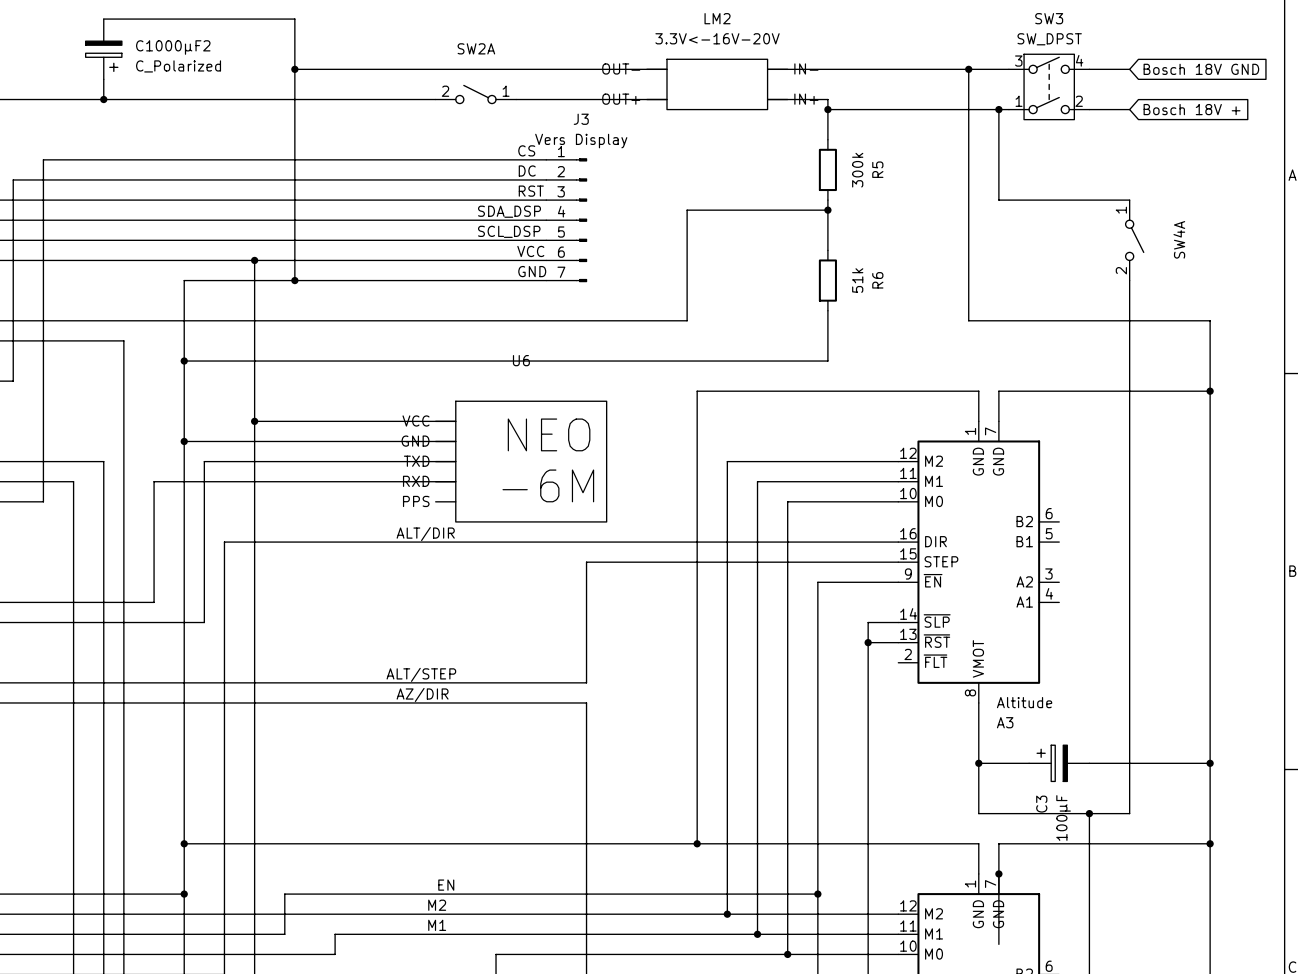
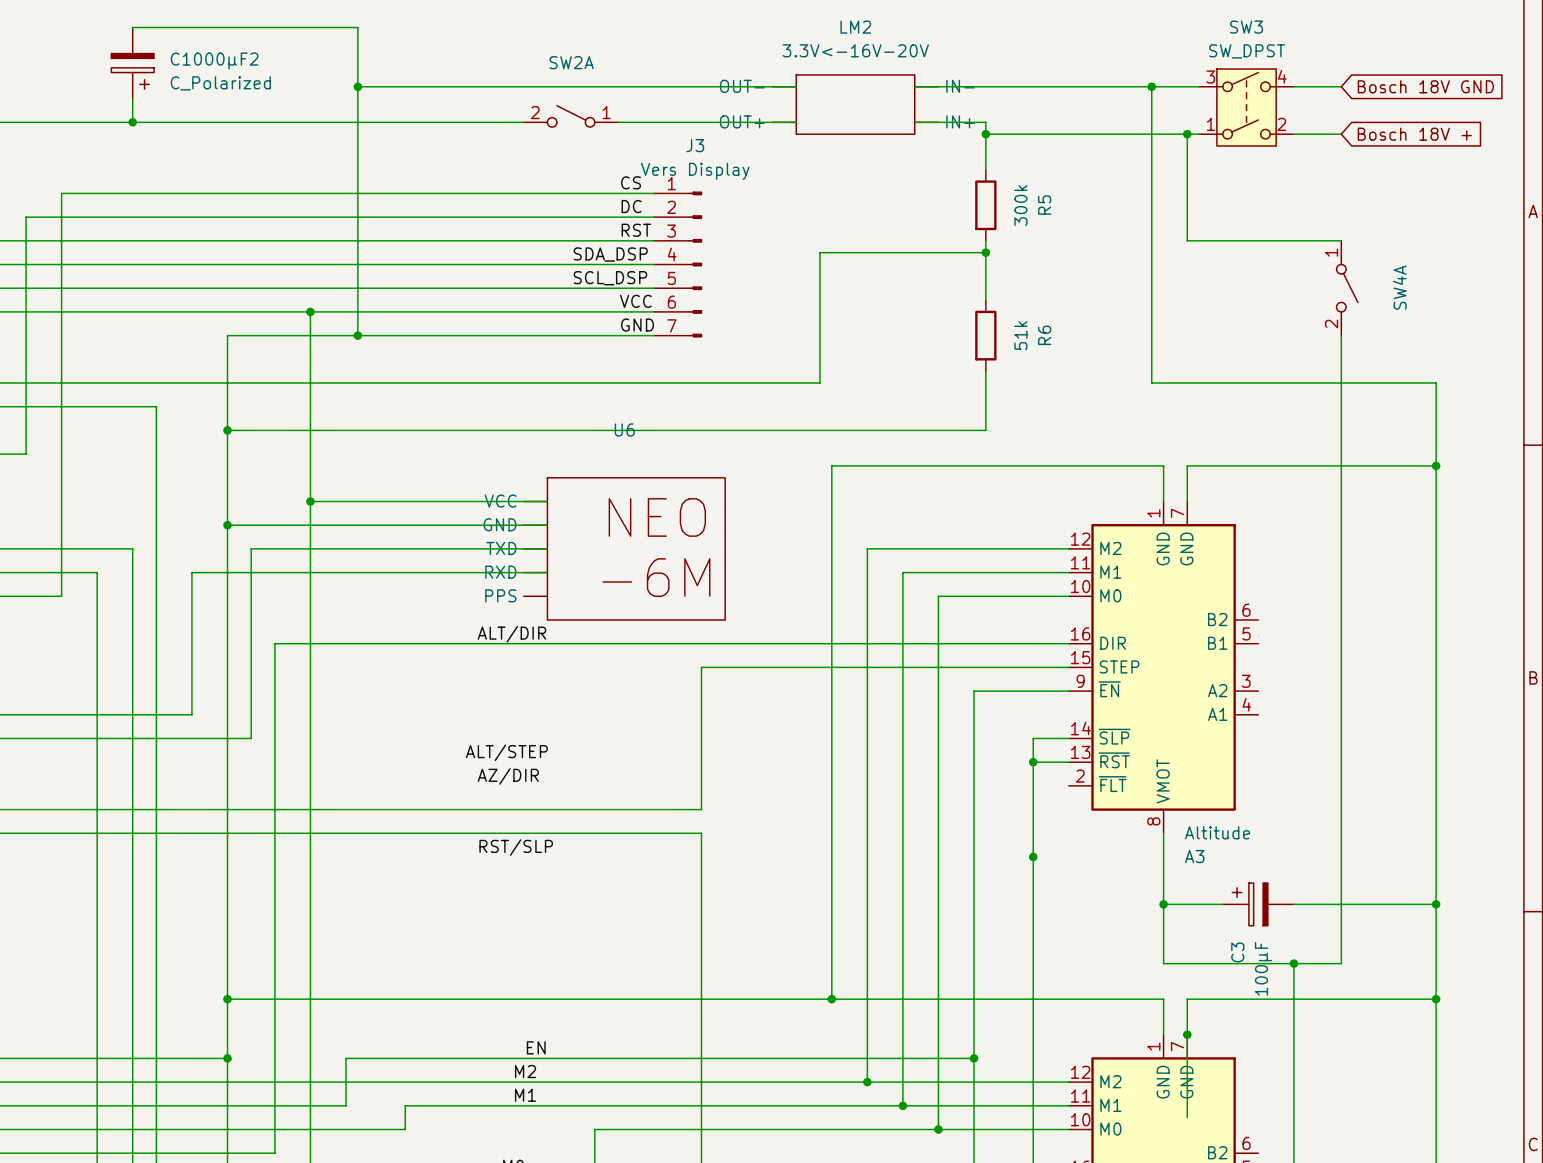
label position: ALT/STEP (421, 674) -> ALT/STEP (506, 752)
label position: AZ/DIR (422, 694) -> AZ/DIR (508, 776)
label: none -> RST/SLP (516, 847)
junction: none -> (1033, 856)

